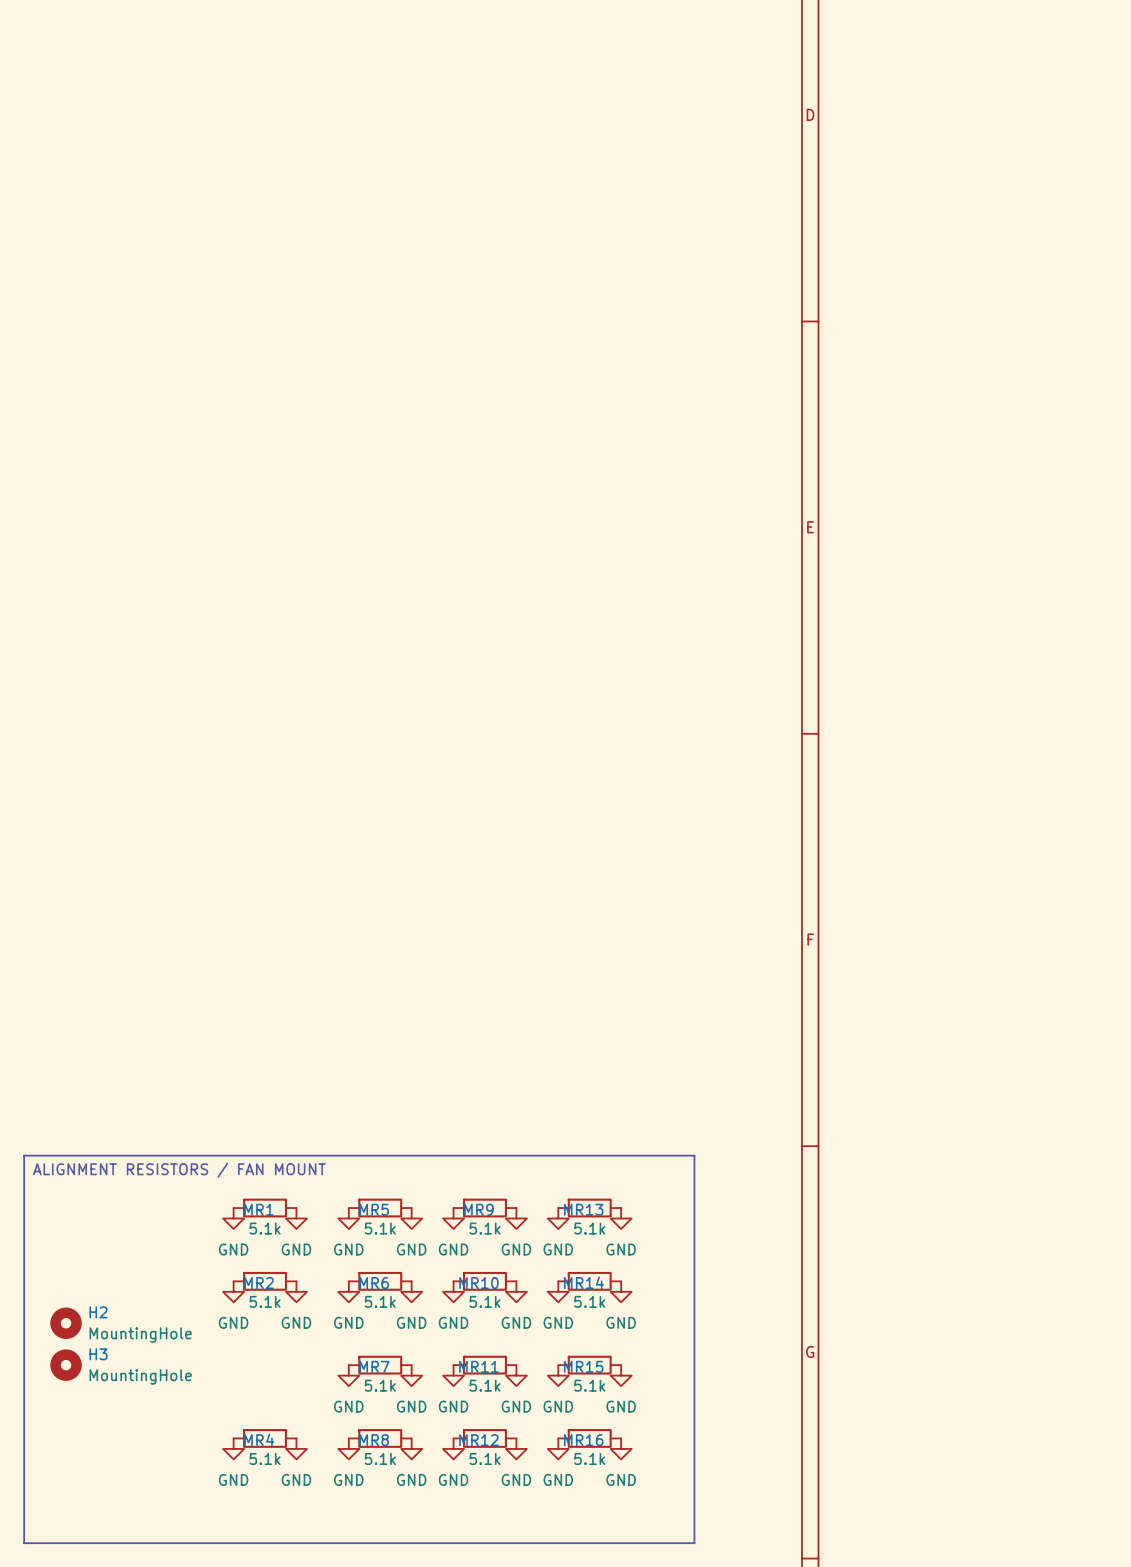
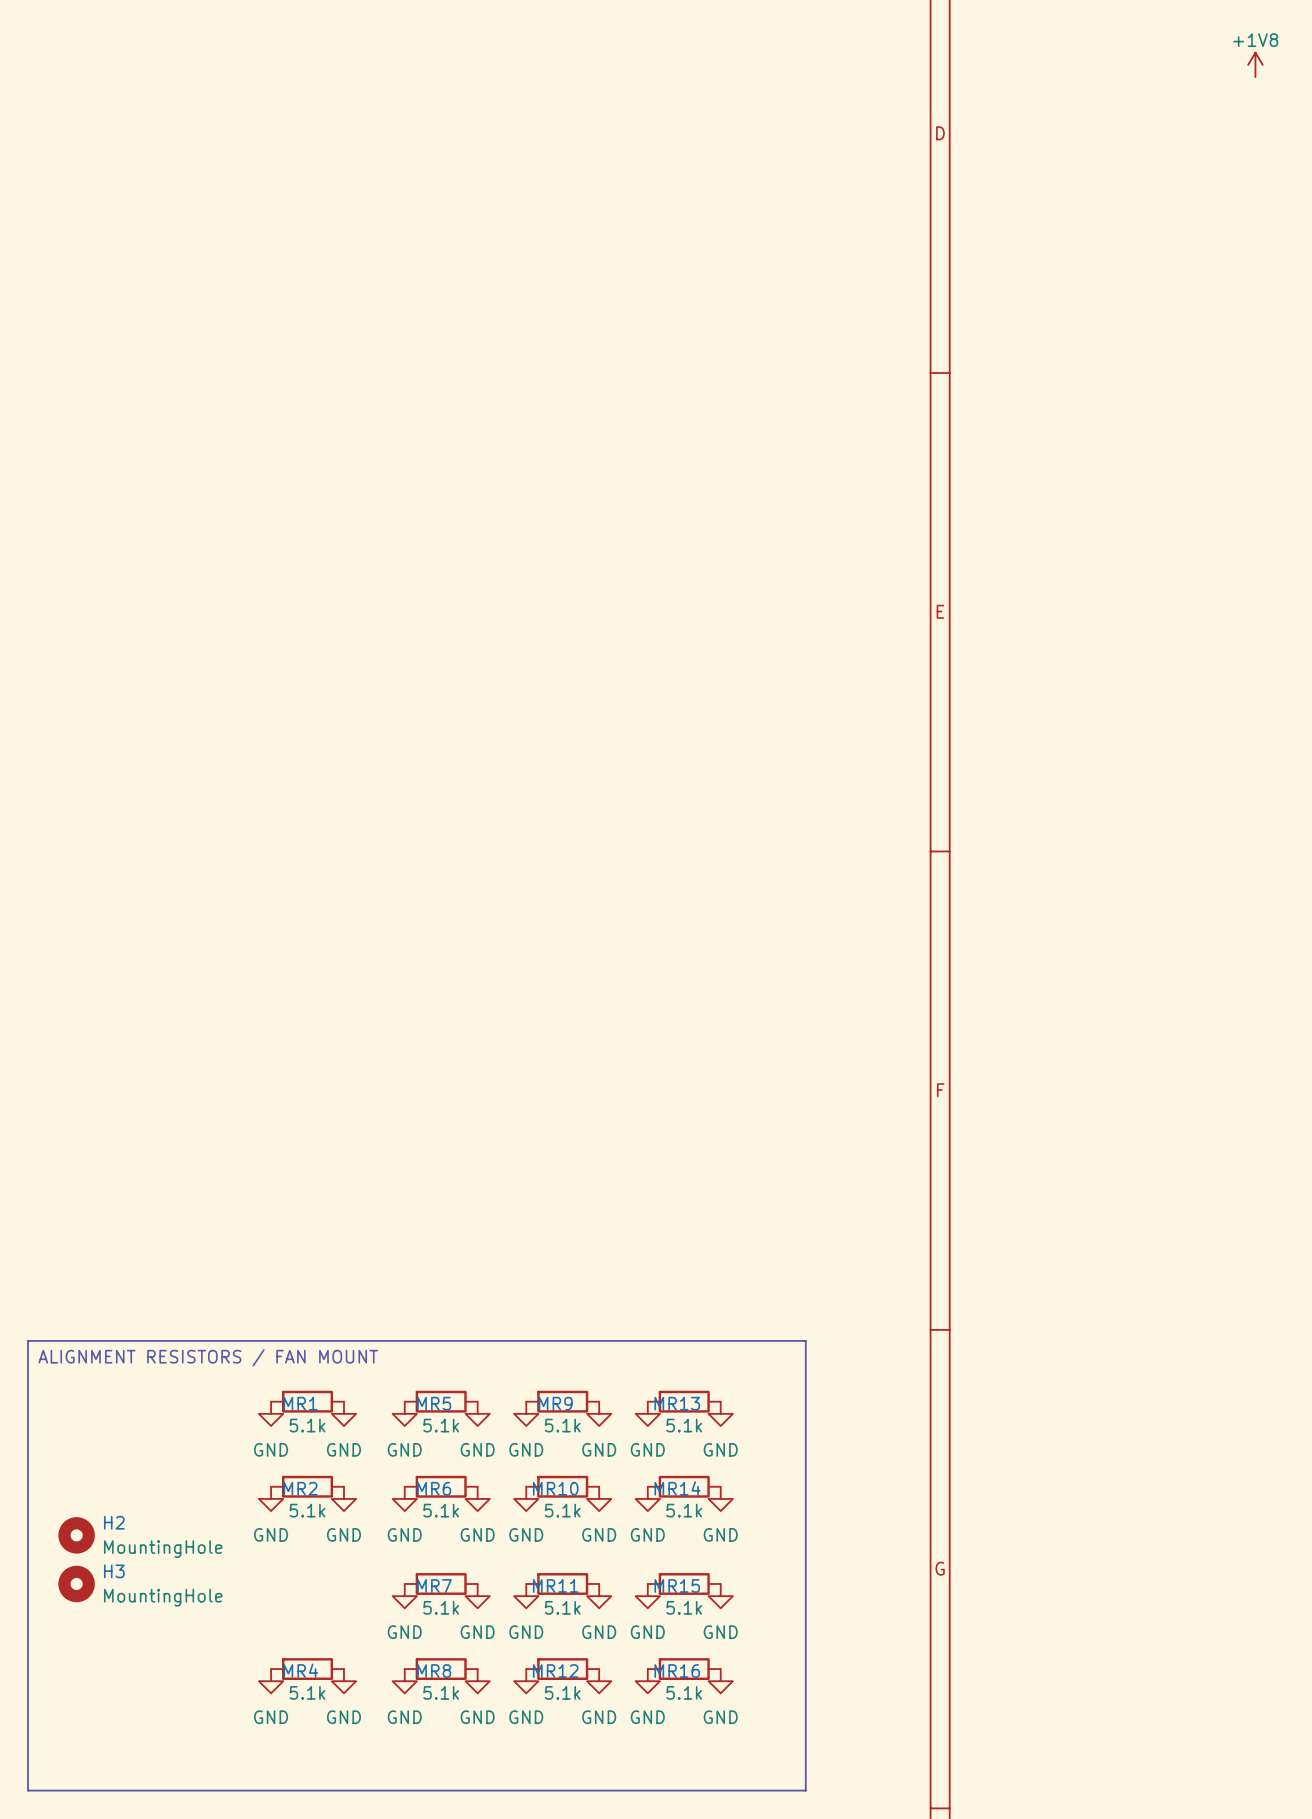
power symbol: none -> +1V8 (1255, 64)

